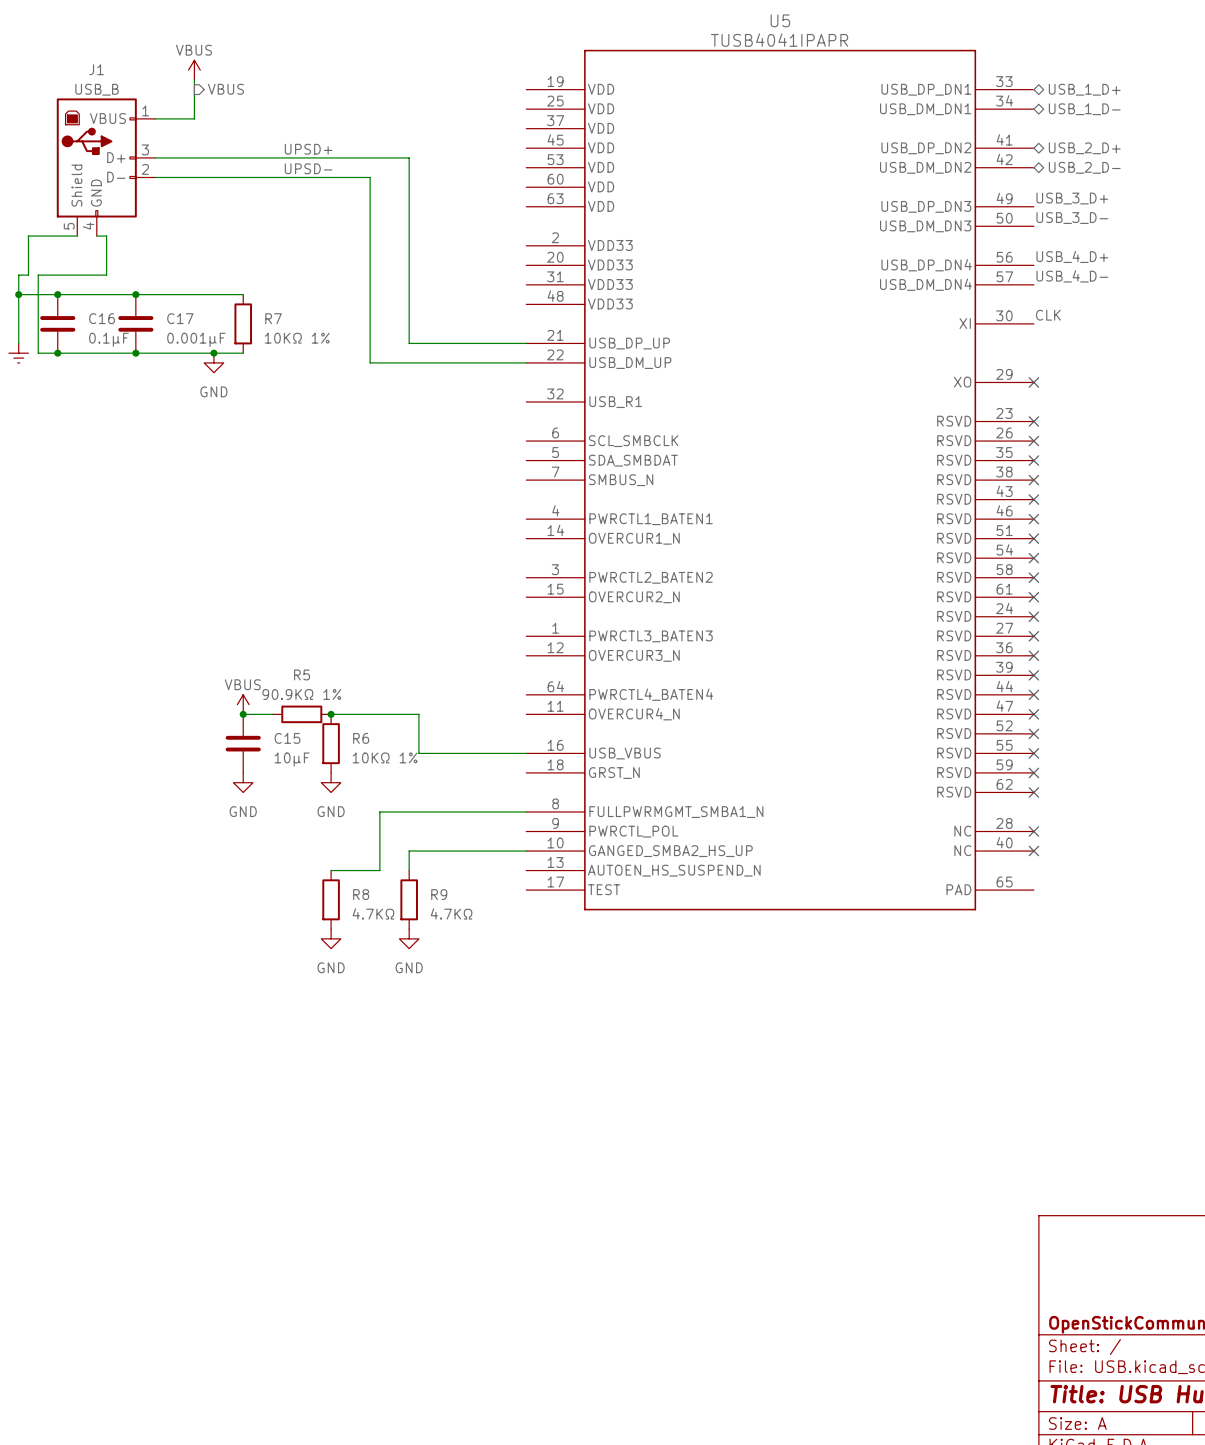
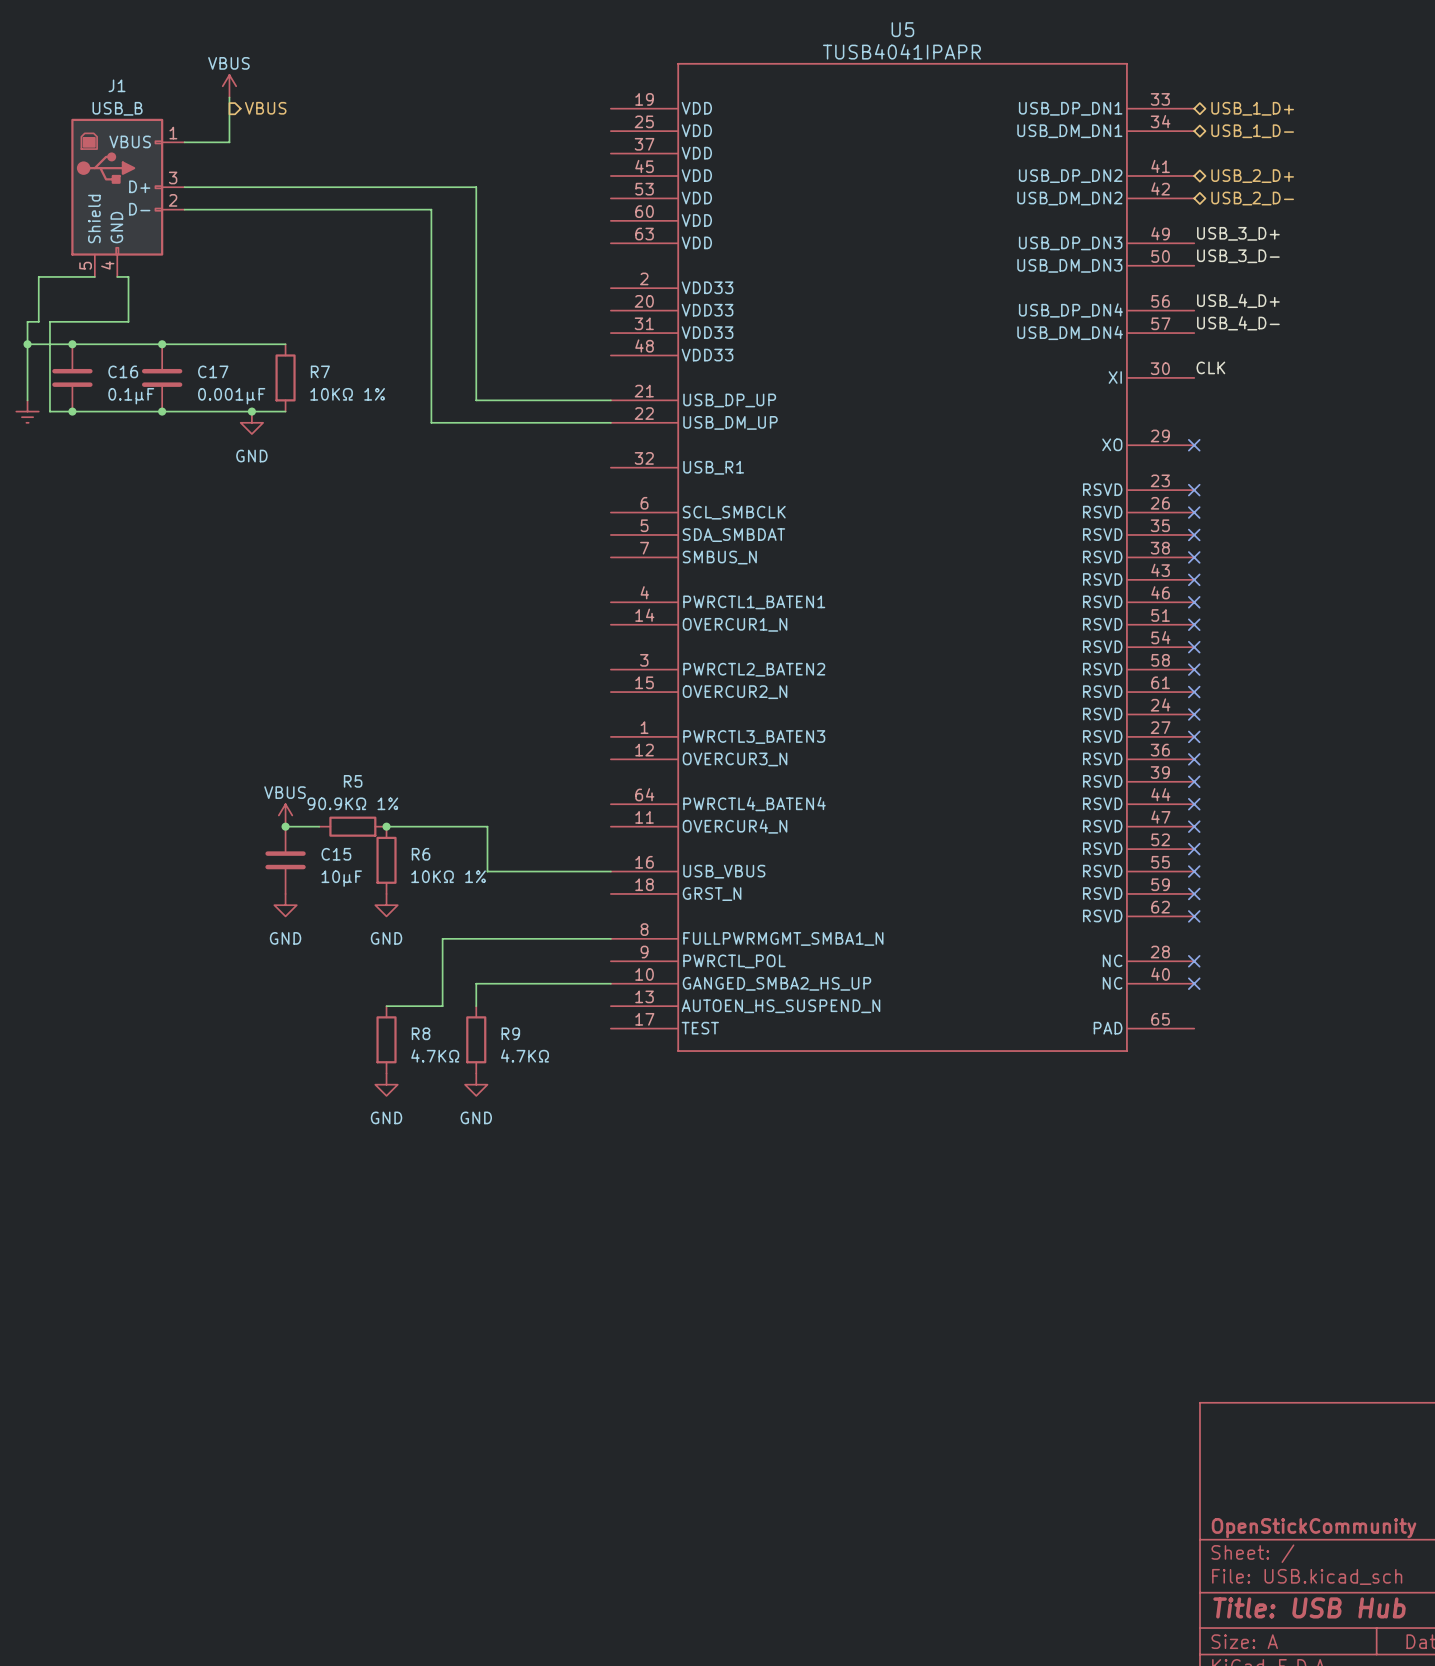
label: UPSD+ (308, 149) -> none
label: UPSD- (308, 168) -> none

